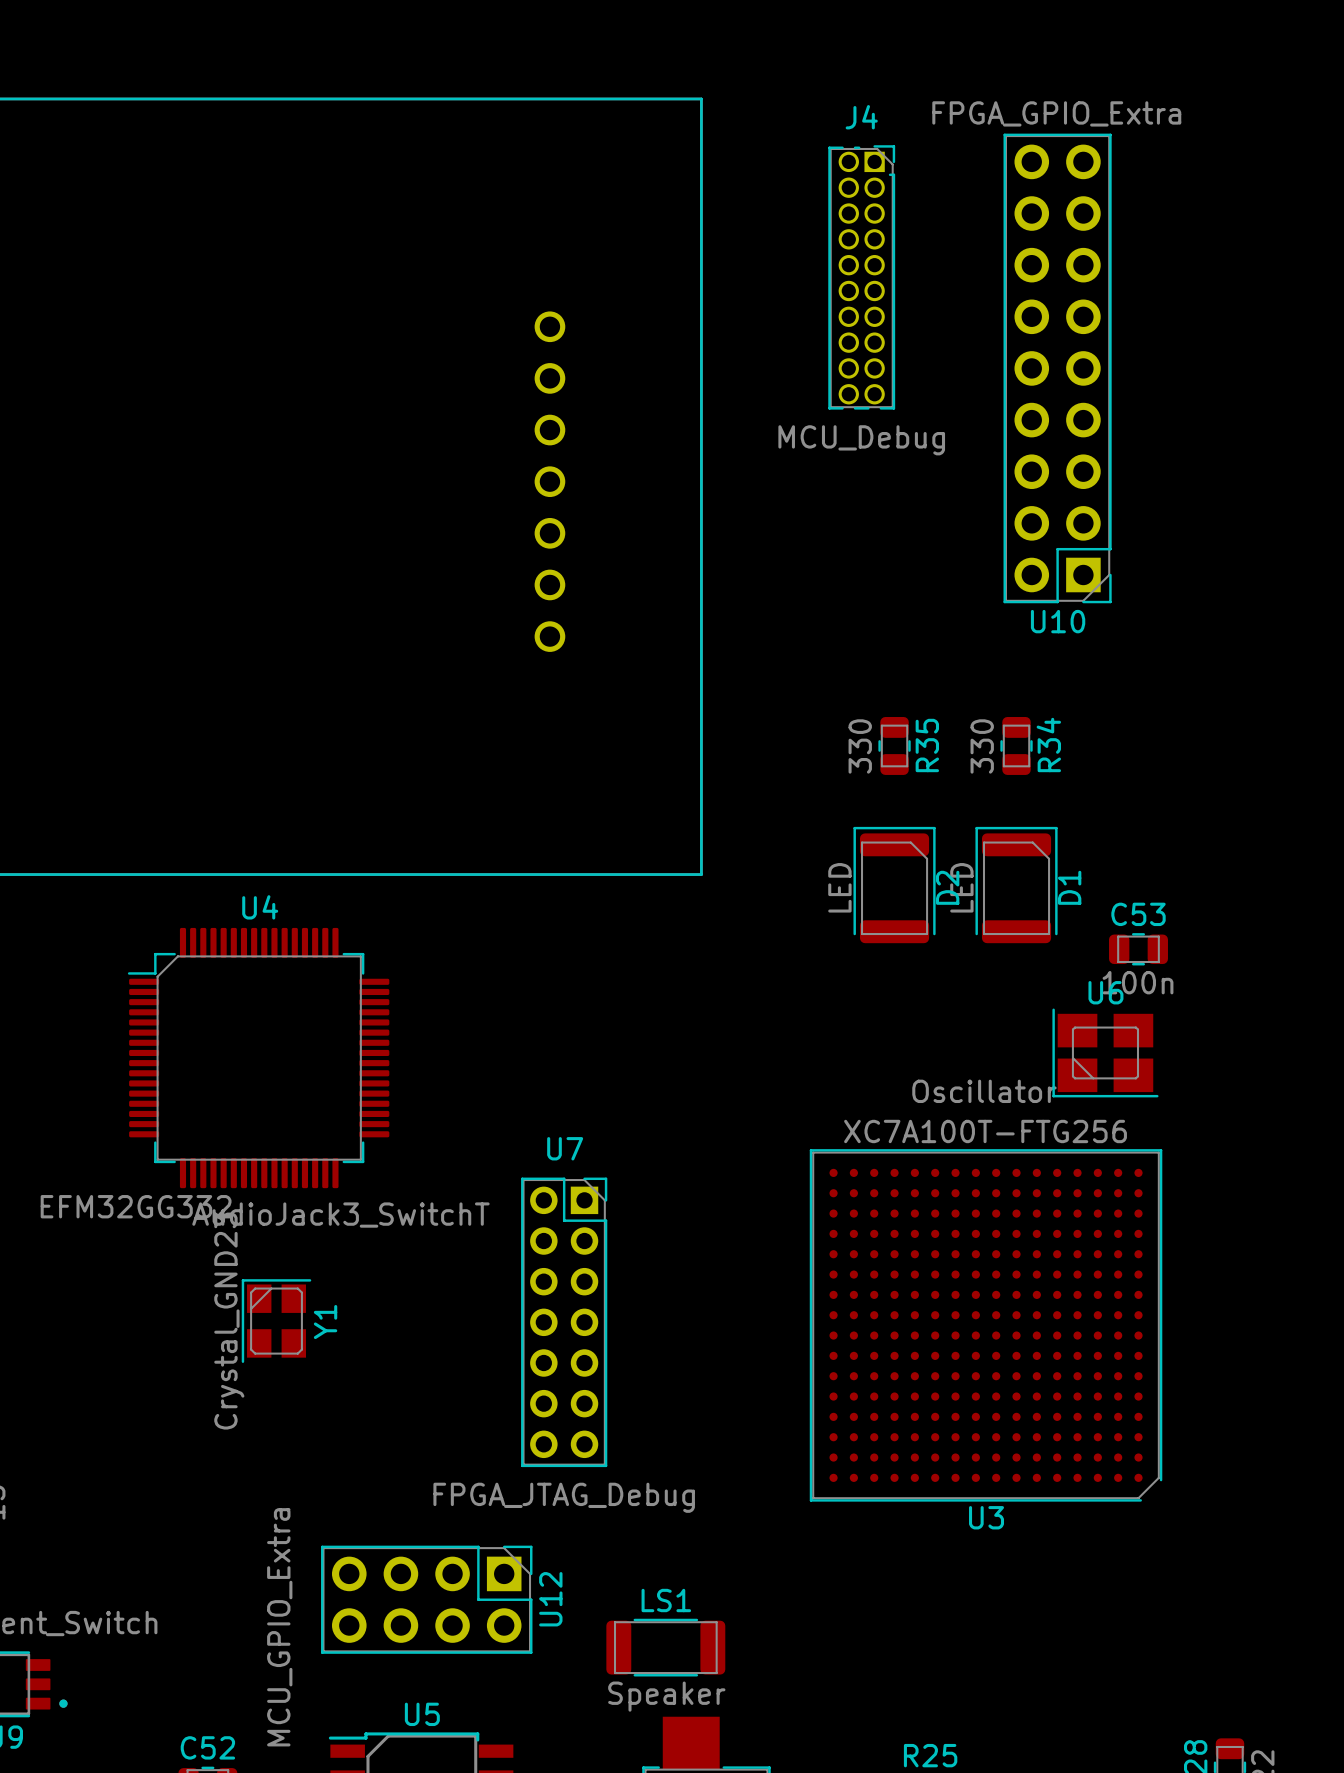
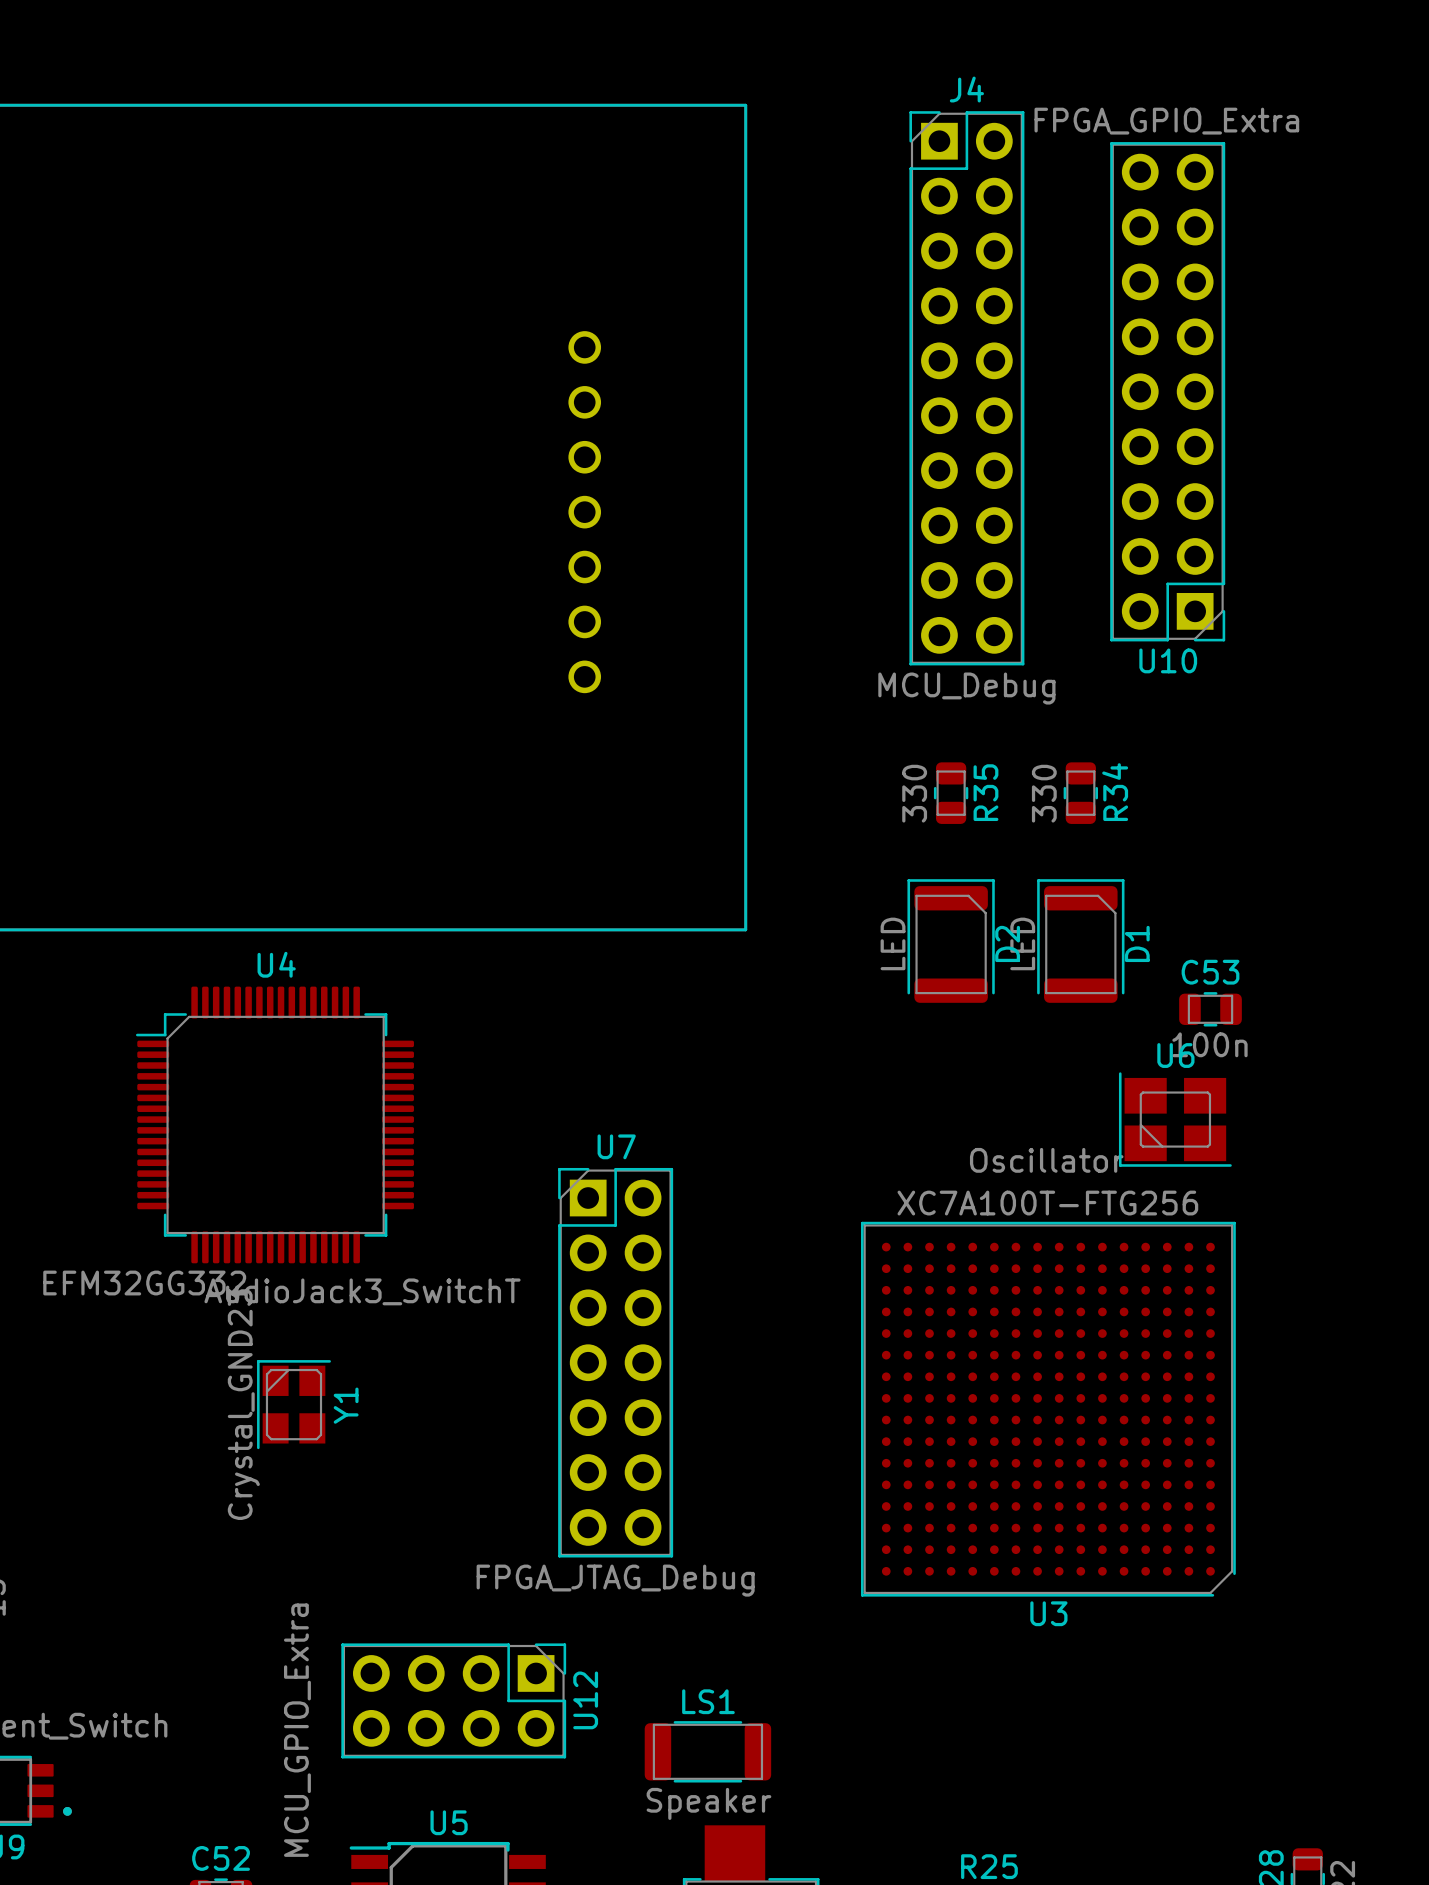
J4 name position: J4 (861, 117) -> J4 (966, 89)
J4 footprint: [828, 145, 896, 410] -> [909, 111, 1025, 666]
U10 position: (1057, 368) -> (1167, 391)
J4 value position: MCU_Debug (861, 440) -> MCU_Debug (966, 688)
U7 footprint: [521, 1177, 608, 1468] -> [558, 1167, 674, 1558]

